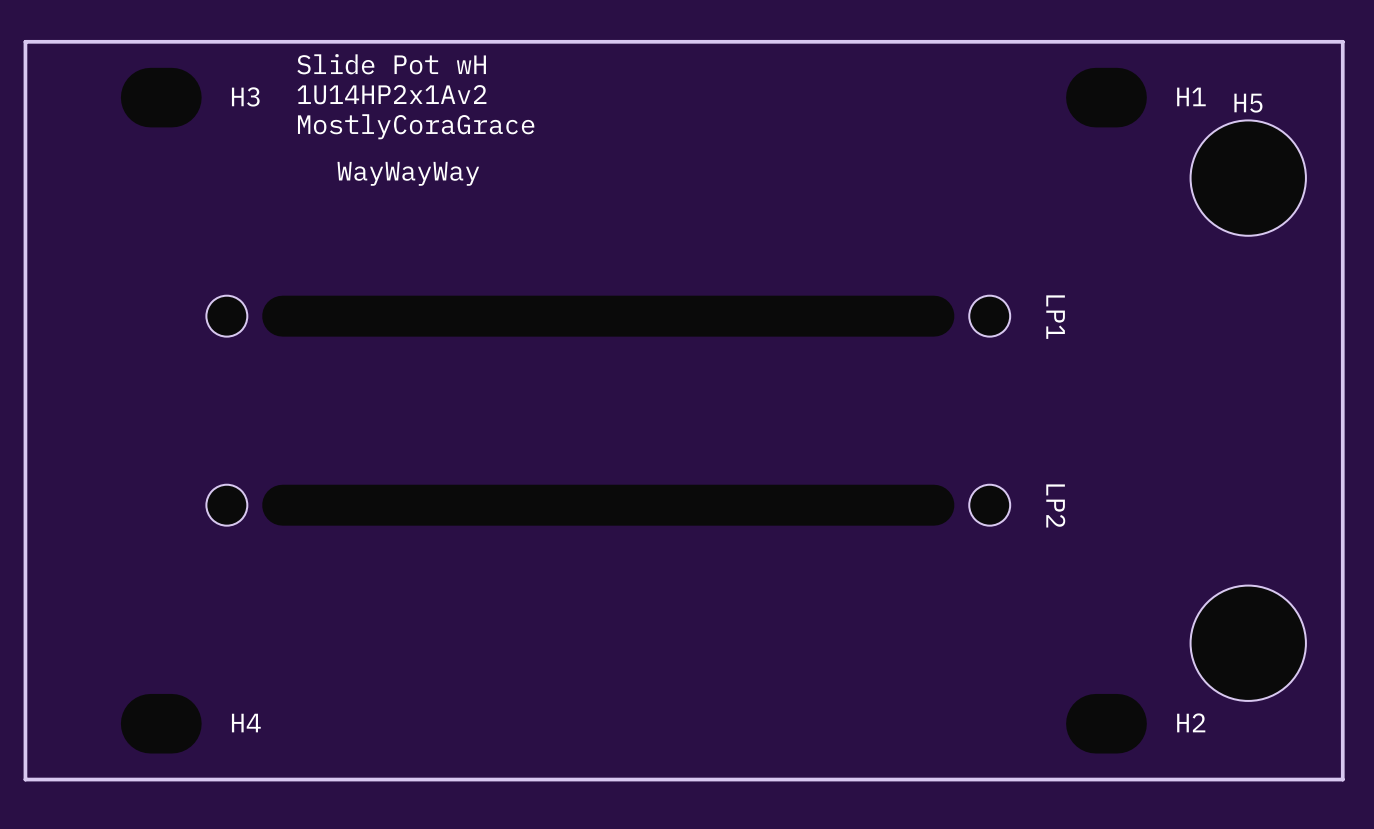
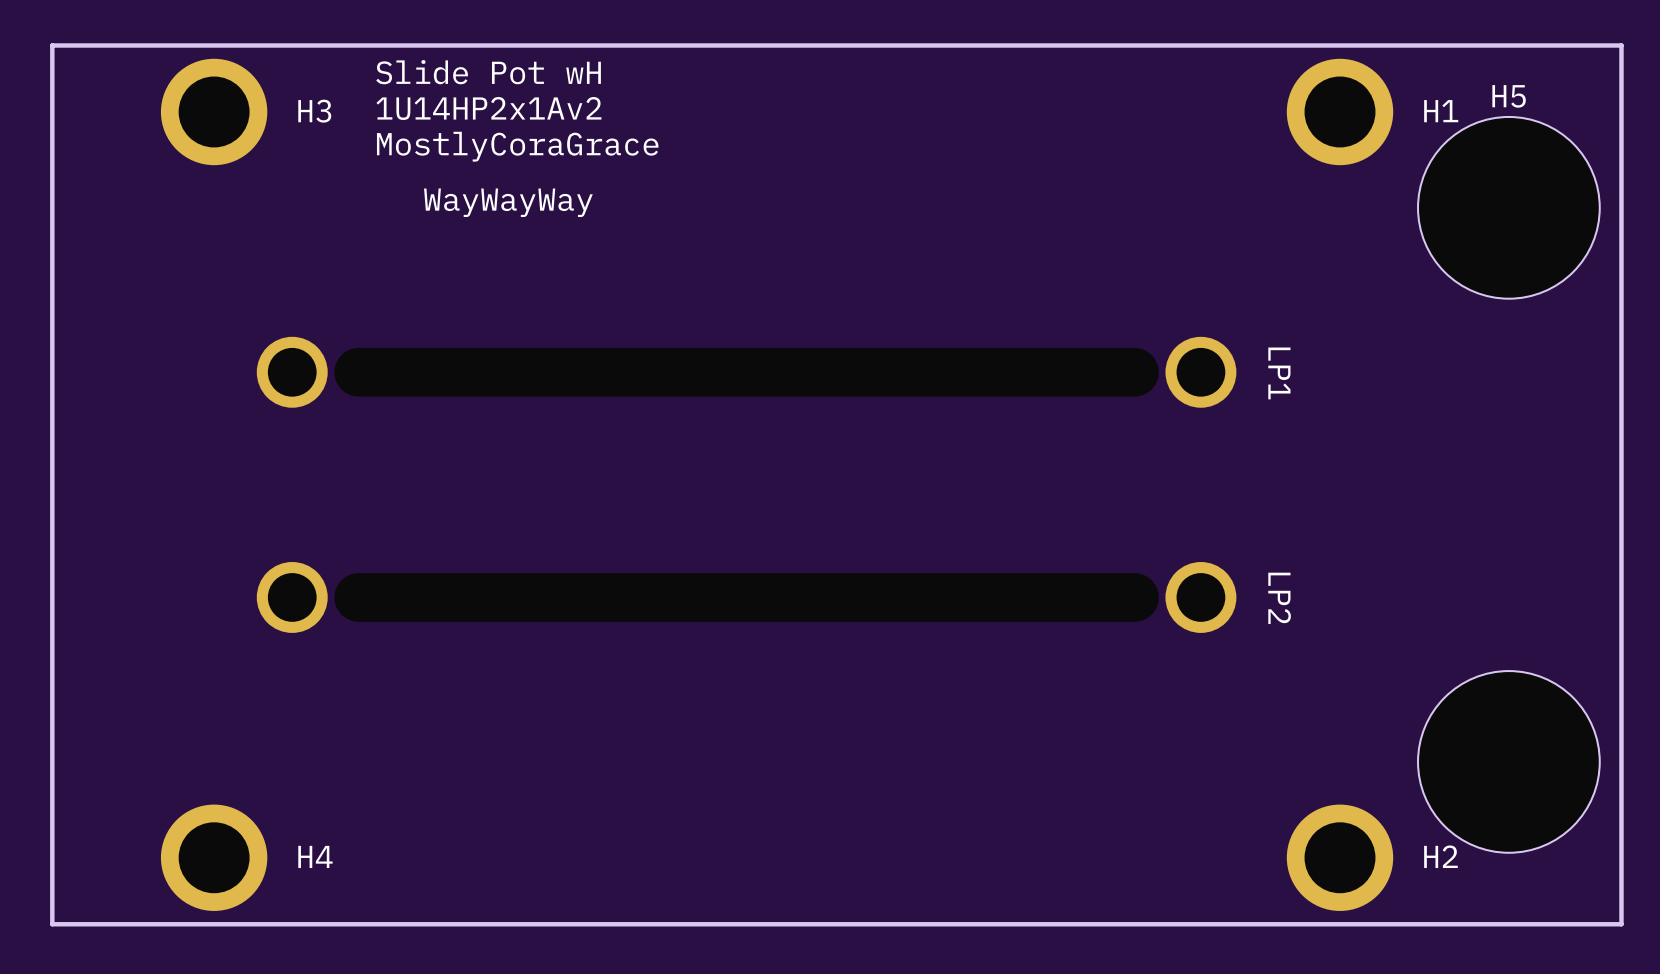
H3 footprint: [120, 67, 202, 128] -> [160, 58, 268, 166]
H1 footprint: [1066, 67, 1147, 128] -> [1286, 58, 1394, 166]
H5 footprint: [1190, 120, 1306, 701] -> [1418, 116, 1600, 853]
LP1 footprint: [206, 295, 1011, 337] -> [256, 336, 1237, 408]
LP2 footprint: [206, 484, 1011, 526] -> [256, 562, 1237, 633]
H4 footprint: [120, 693, 202, 754] -> [160, 804, 268, 911]
H2 footprint: [1066, 693, 1147, 754] -> [1286, 804, 1394, 911]

